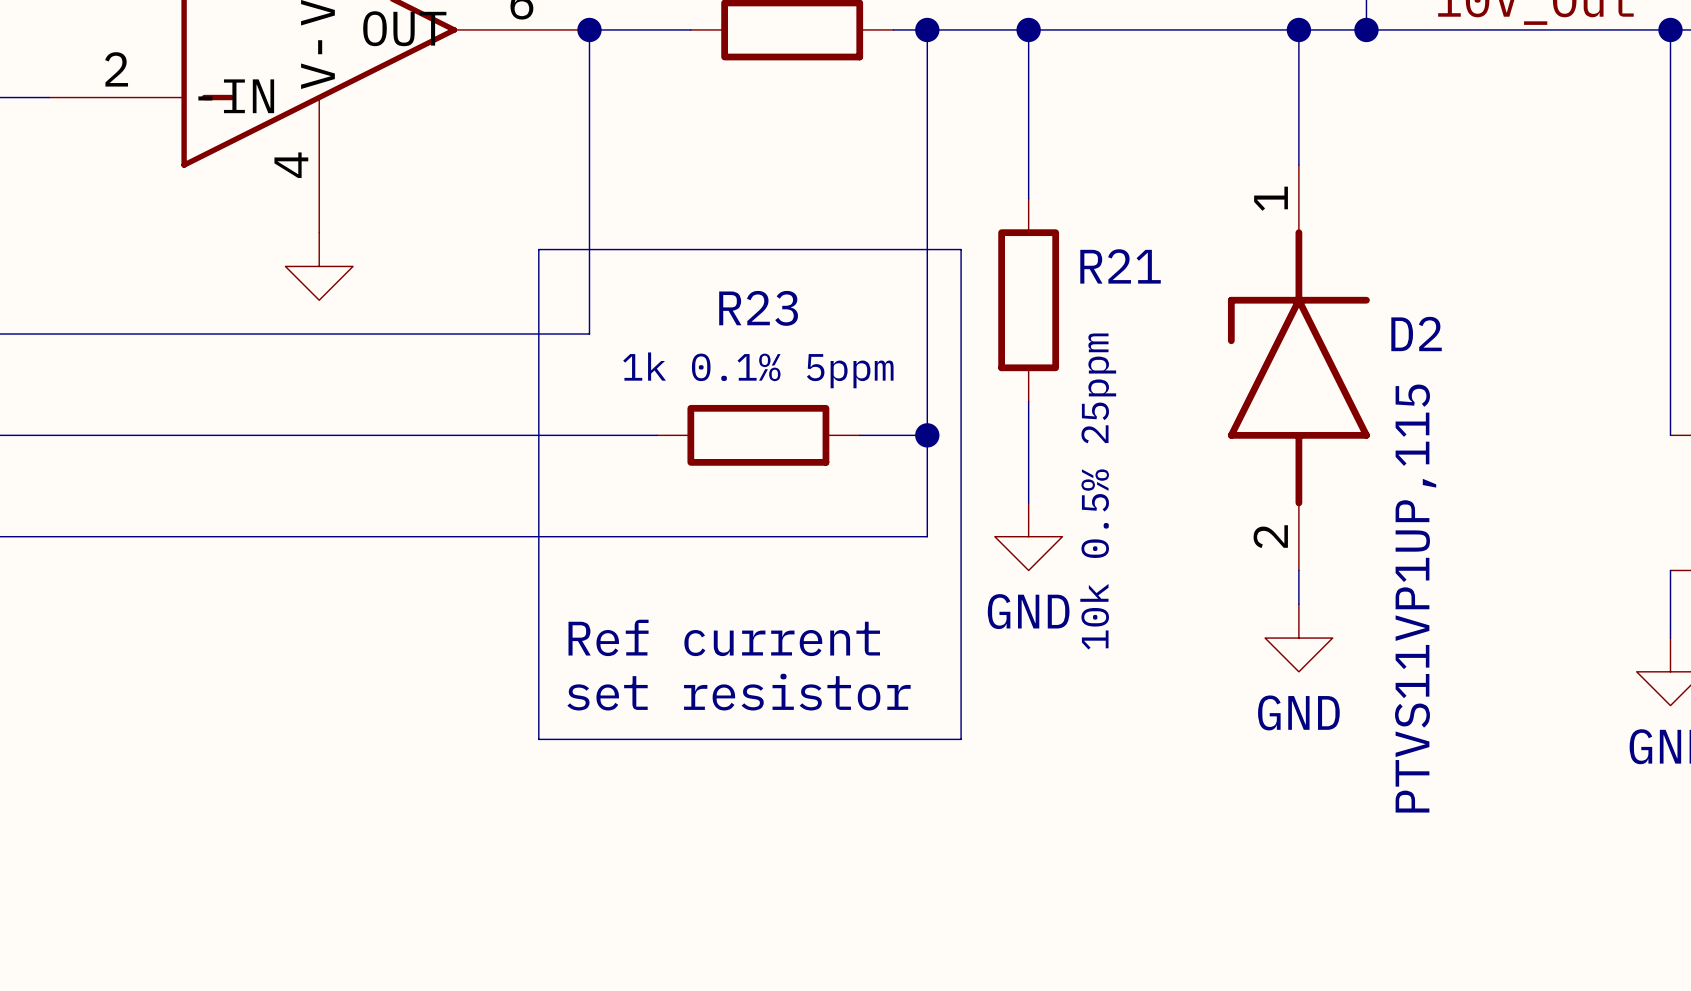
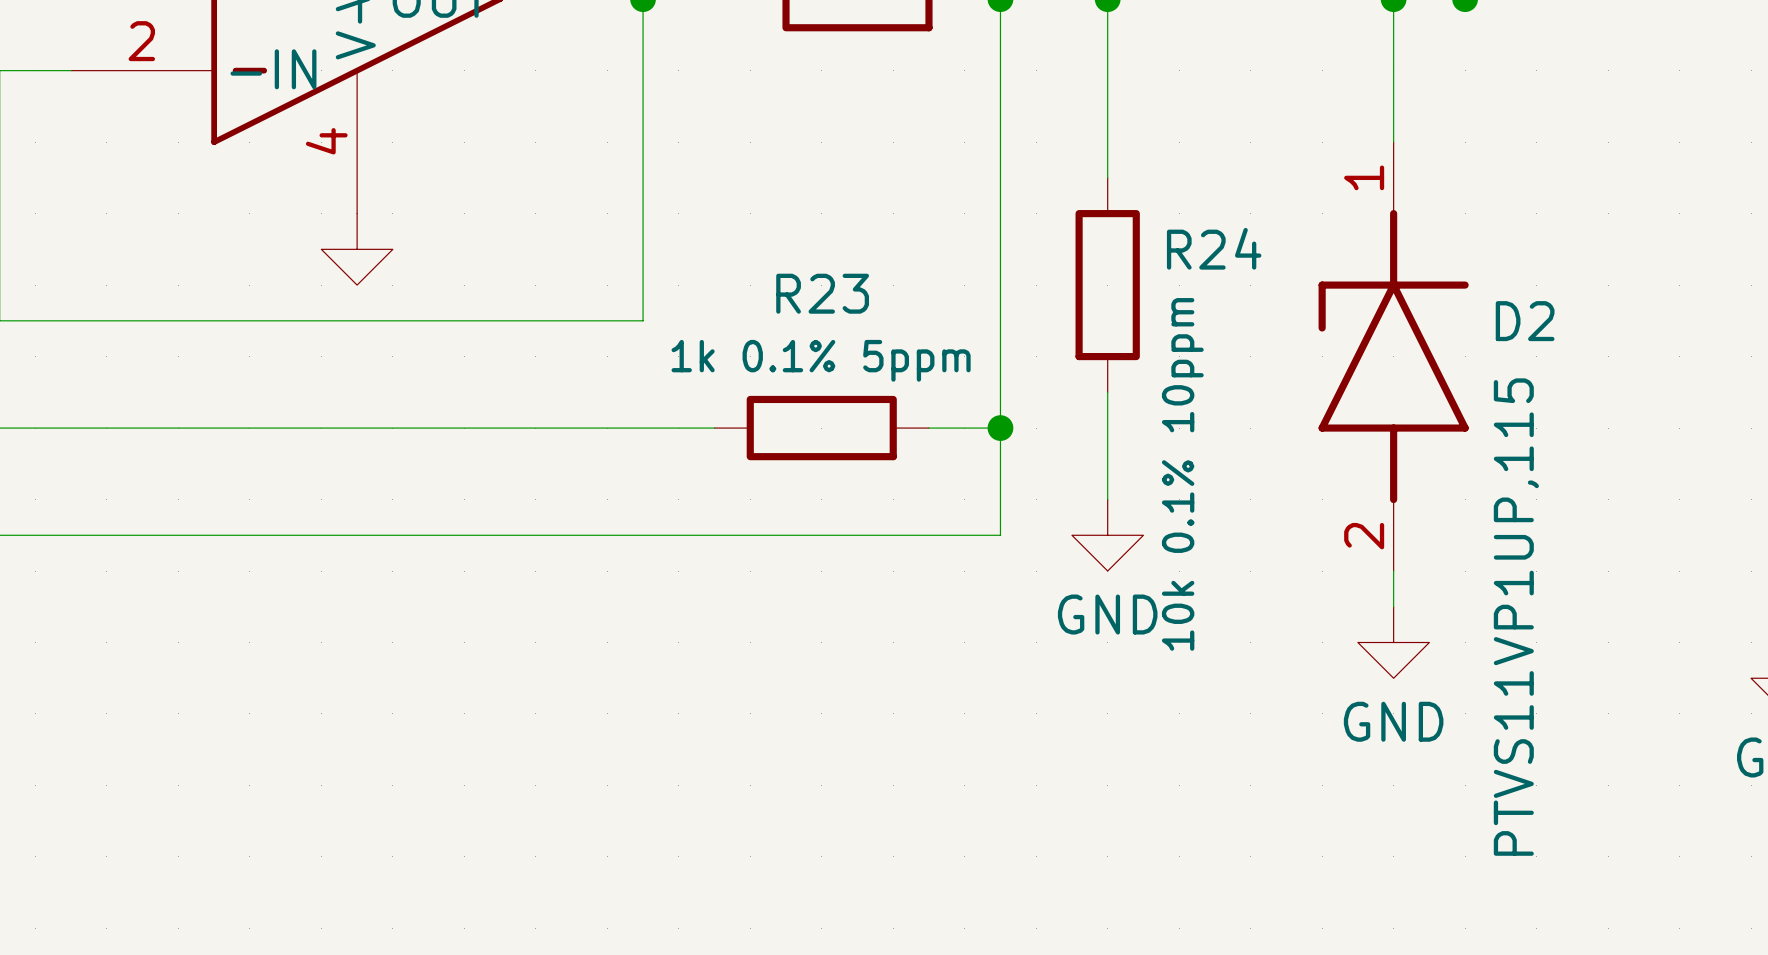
line: (538, 249) (961, 249) (961, 739) (538, 739) (538, 249) -> none
R21 name: R21 (1120, 266) -> R24 (1214, 248)
R21 value: 10k 0.5% 25ppm (1098, 491) -> 10k 0.1% 10ppm (1182, 474)
text: Ref current (724, 637) -> none
text: set resistor (739, 692) -> none

